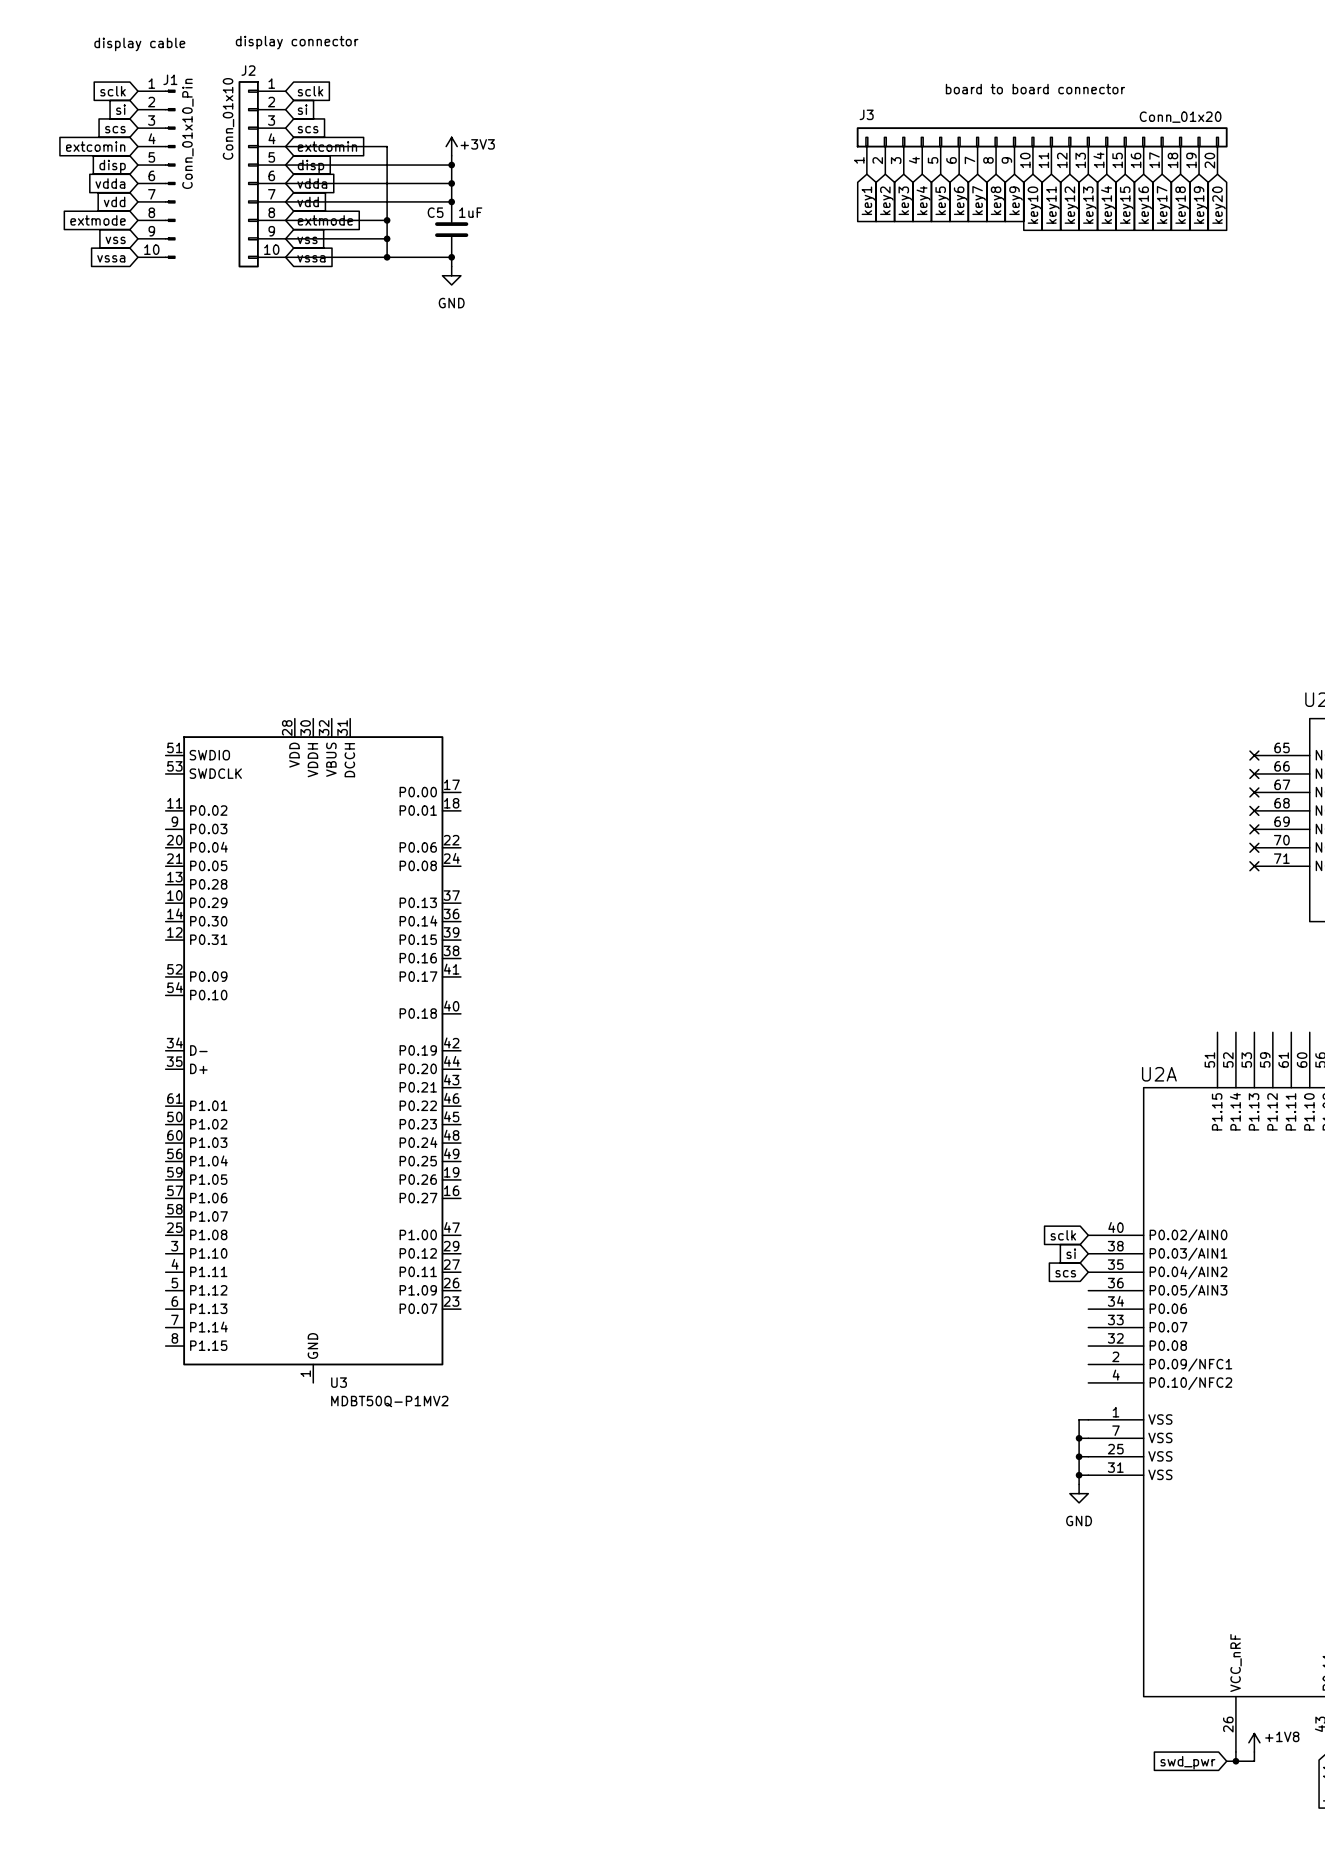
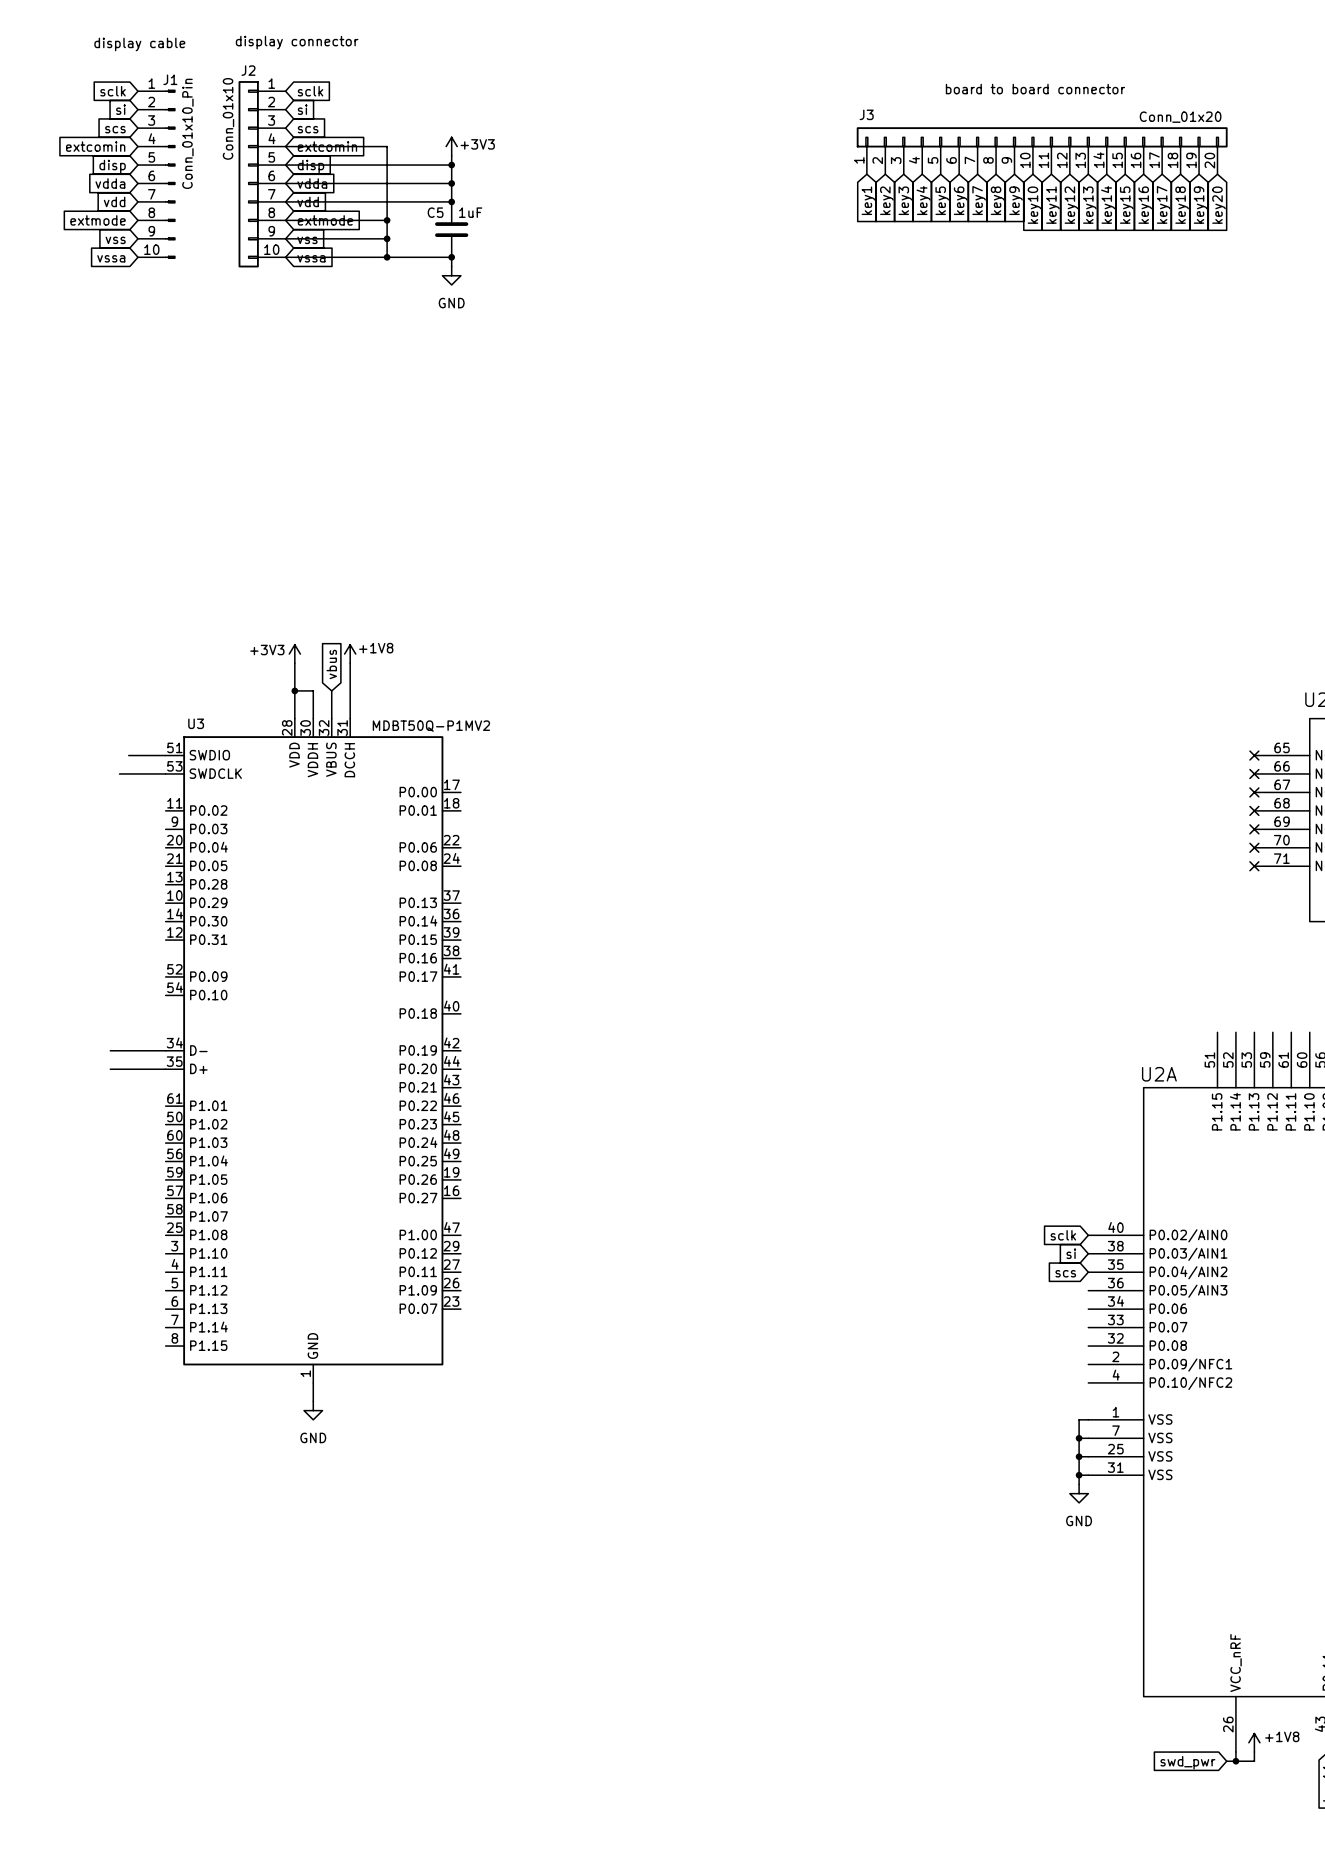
power symbol: none -> +3V3 (294, 654)
power symbol: none -> +1V8 (350, 654)
wire: none -> (294, 663) (294, 718)
wire: none -> (350, 663) (350, 718)
global label: none -> vbus (331, 664)
wire: none -> (294, 690) (313, 690) (313, 718)
junction: none -> (294, 690)
wire: none -> (331, 690) (331, 718)
wire: none -> (128, 755) (165, 755)
wire: none -> (119, 773) (165, 773)
wire: none -> (110, 1050) (165, 1050)
wire: none -> (110, 1069) (165, 1069)
wire: none -> (313, 1382) (313, 1401)
U3 name position: U3 (339, 1382) -> U3 (196, 723)
U3 value position: MDBT50Q-P1MV2 (389, 1401) -> MDBT50Q-P1MV2 (431, 726)
power symbol: none -> GND (313, 1410)

